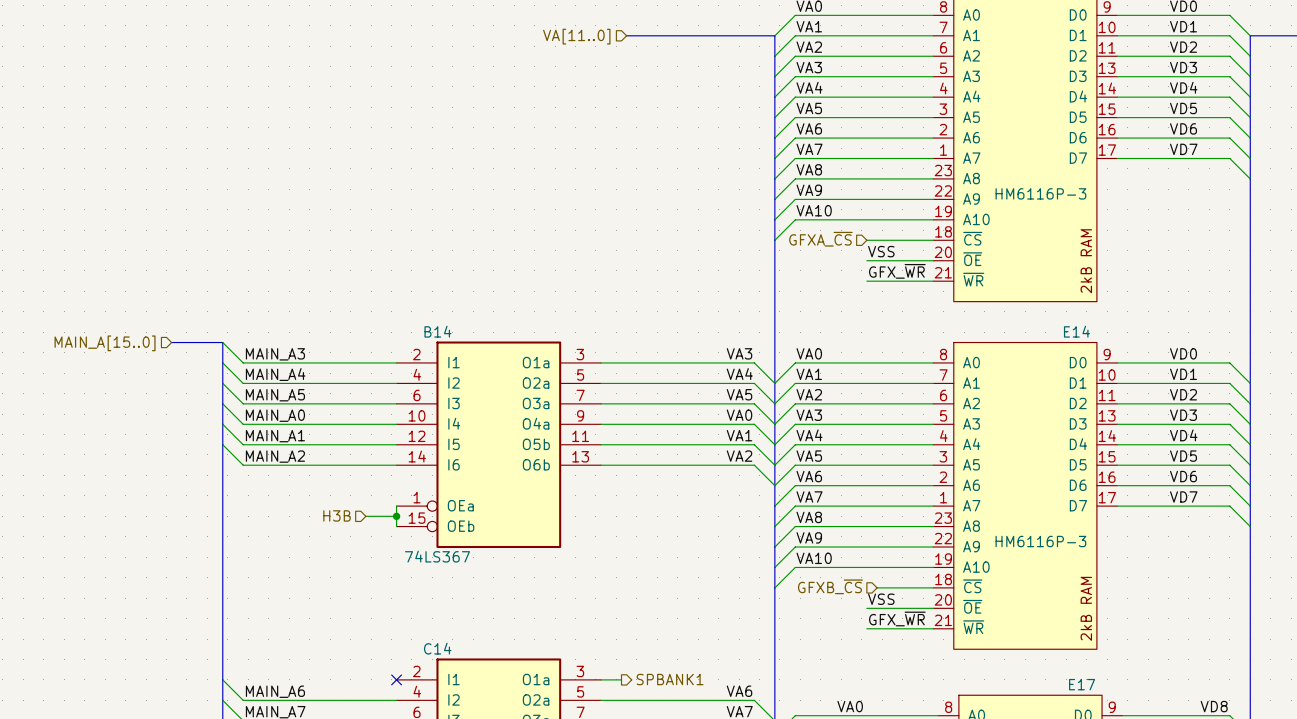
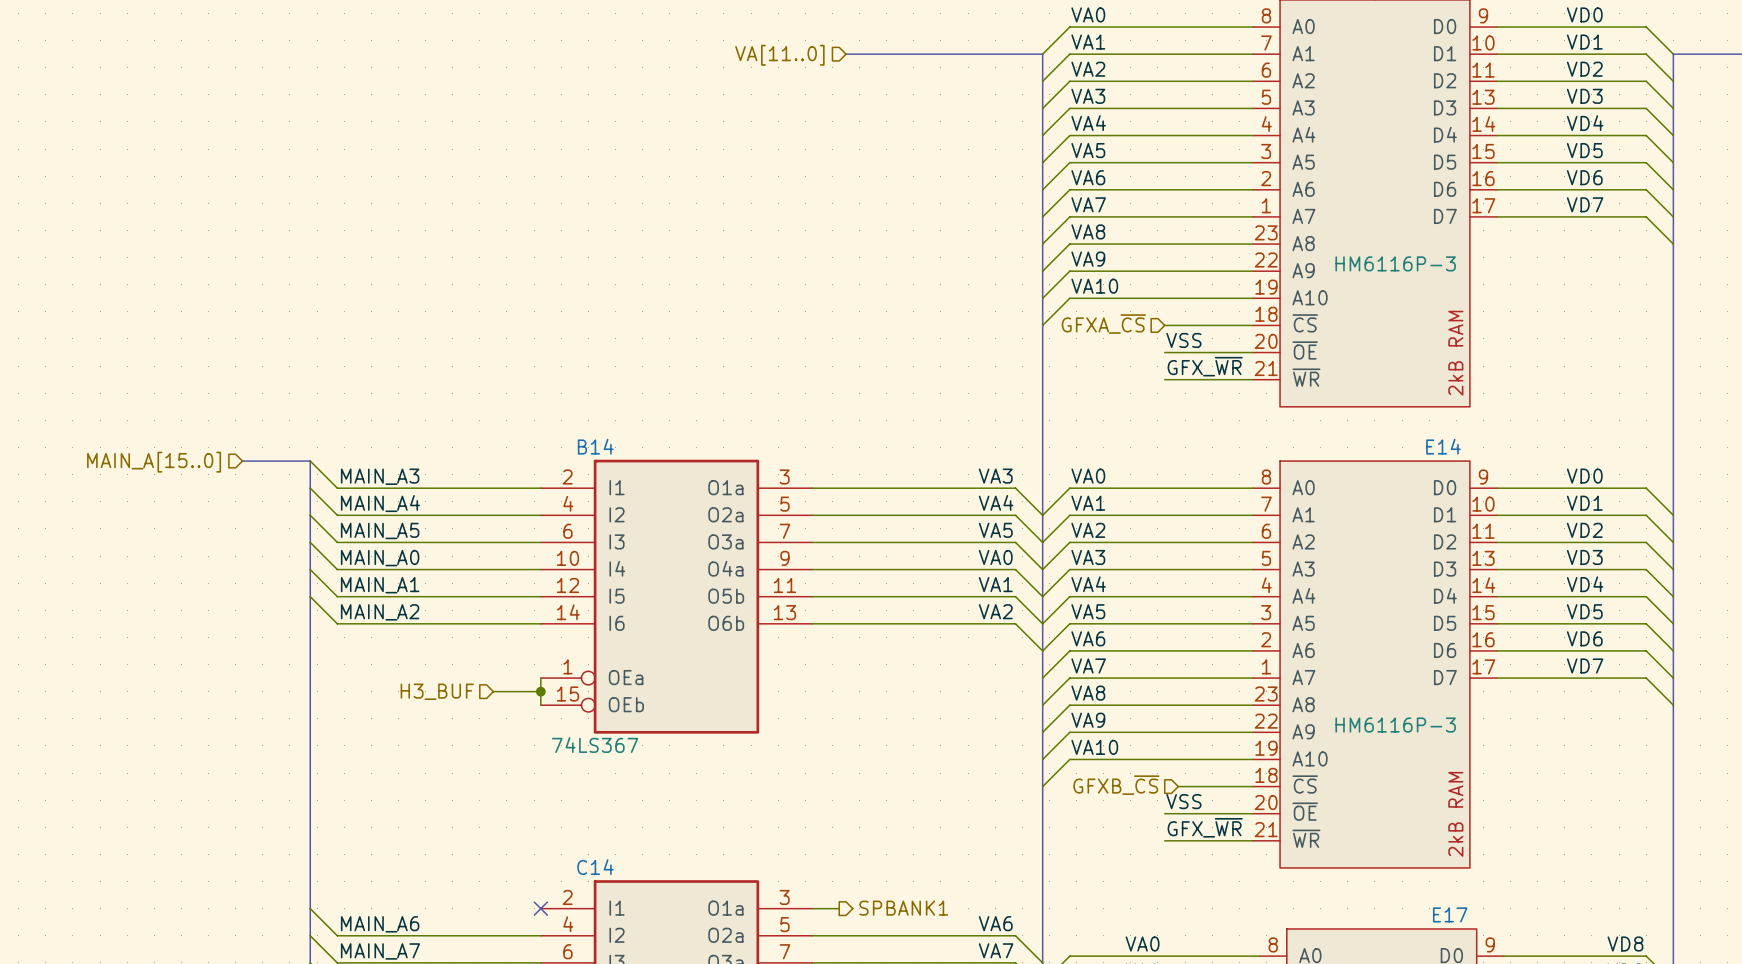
hierarchical label: H3B (337, 515) -> H3_BUF (437, 691)
wire: none -> (493, 691) (500, 691)

